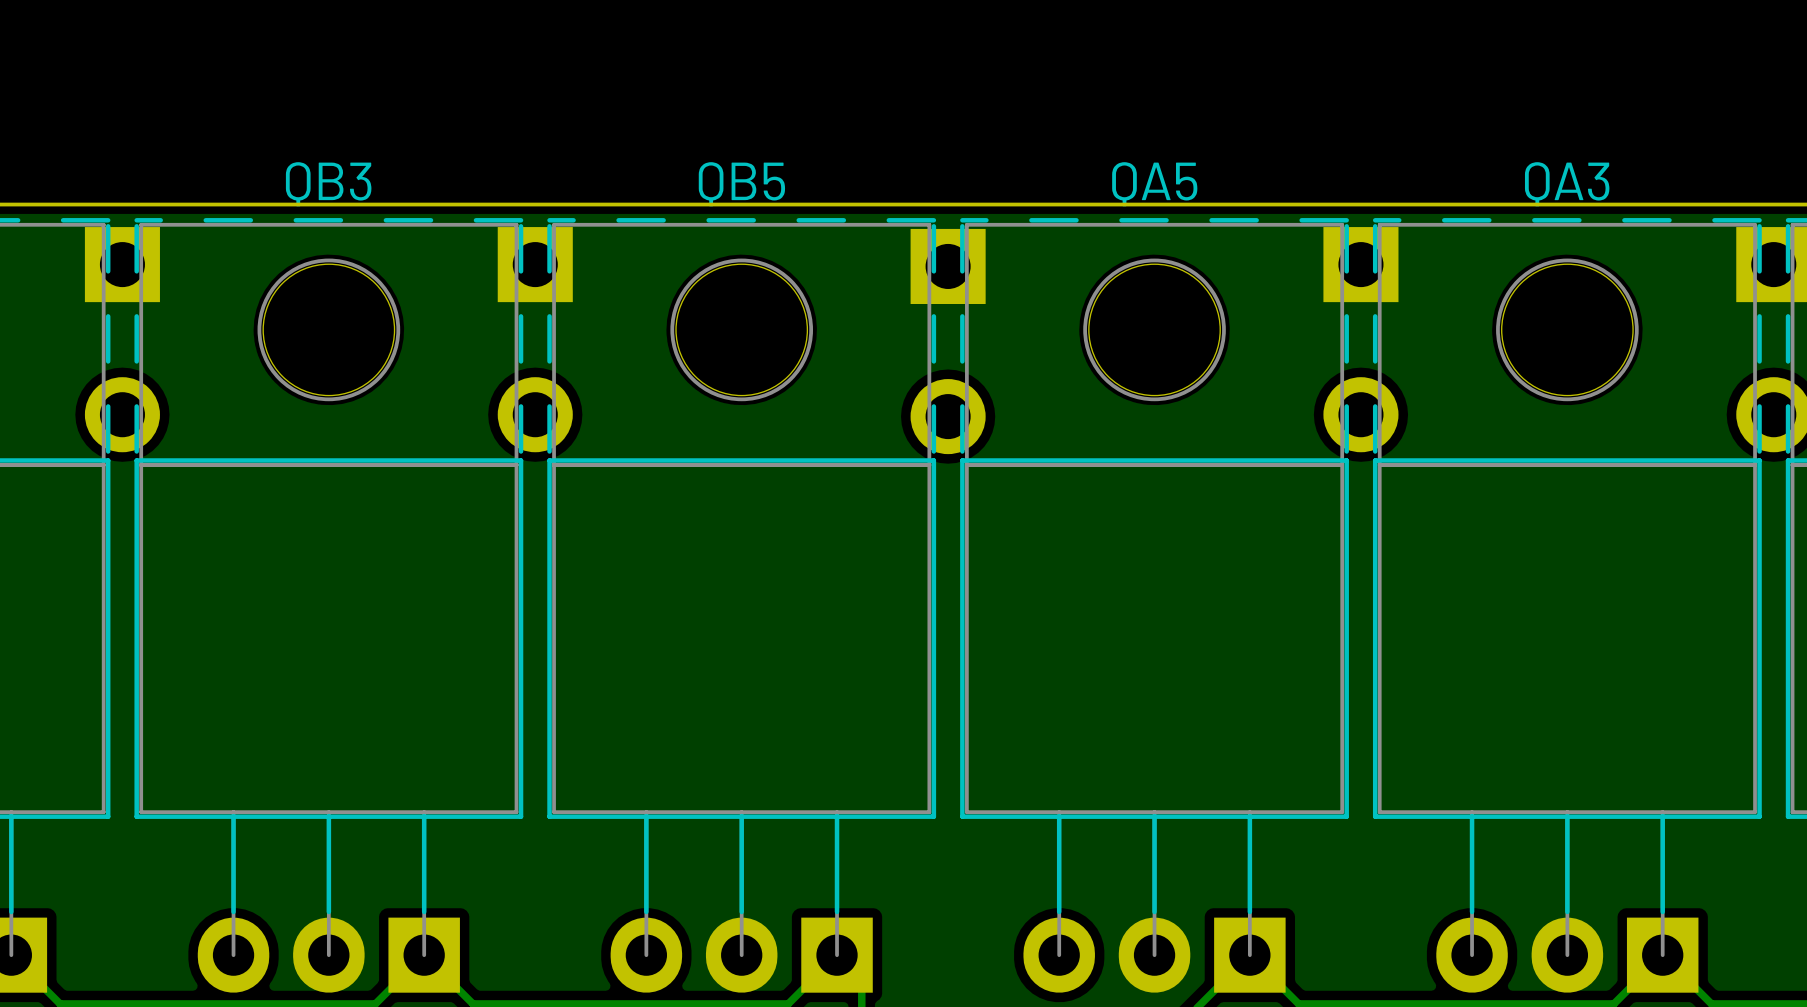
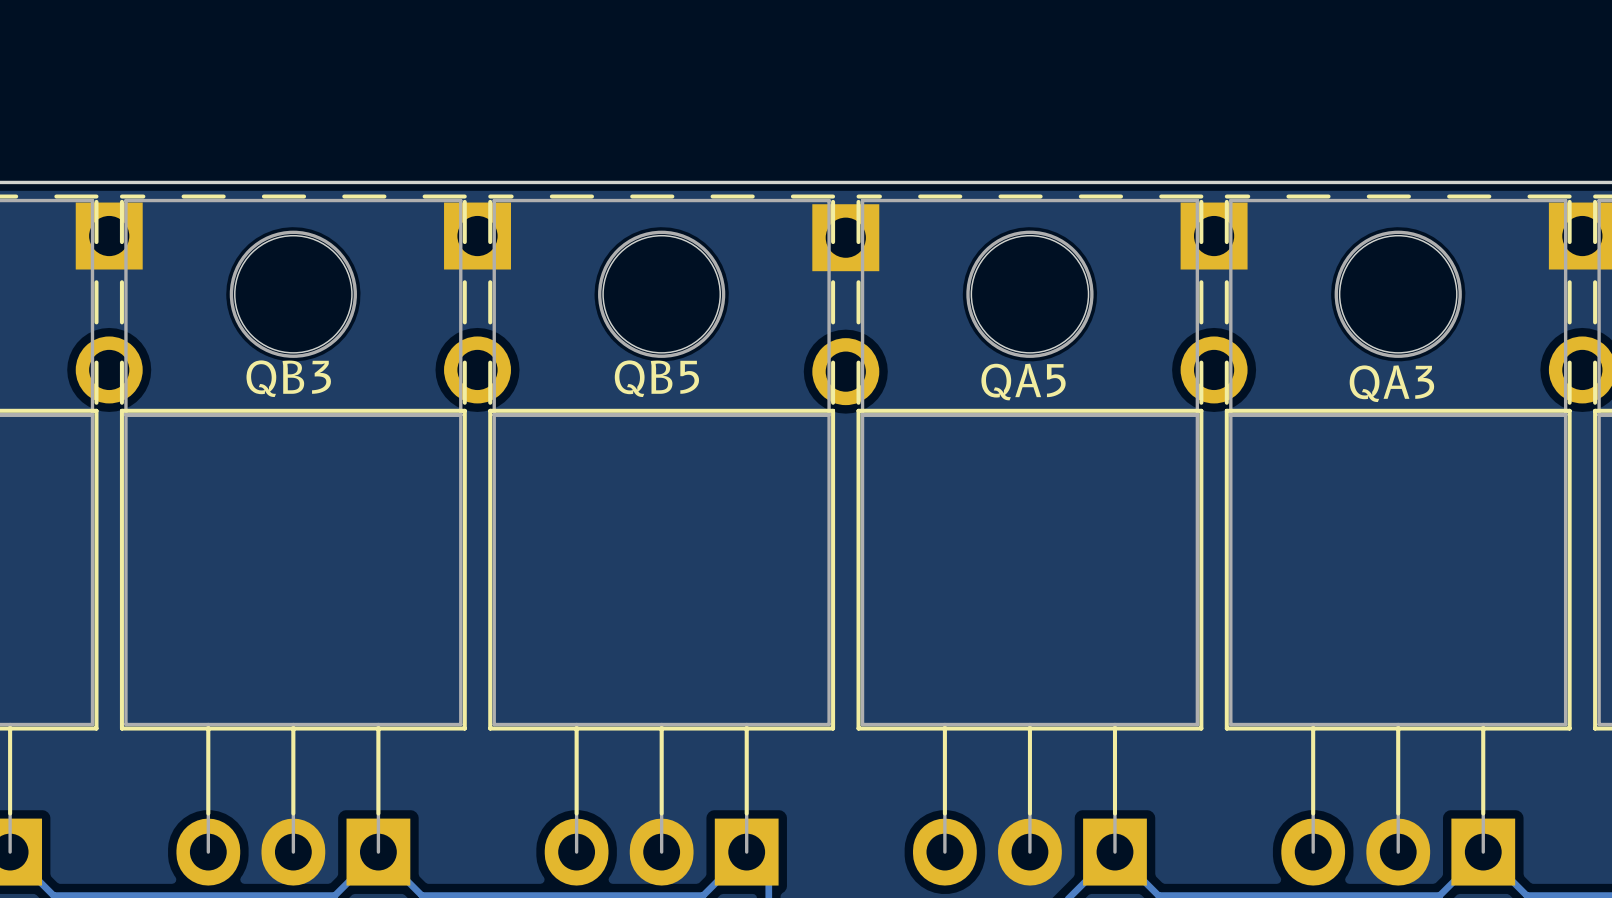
QB3 name position: QB3 (328, 184) -> QB3 (288, 378)
QB5 name position: QB5 (741, 184) -> QB5 (656, 378)
QA5 name position: QA5 (1154, 184) -> QA5 (1023, 382)
QA3 name position: QA3 (1567, 184) -> QA3 (1391, 383)

